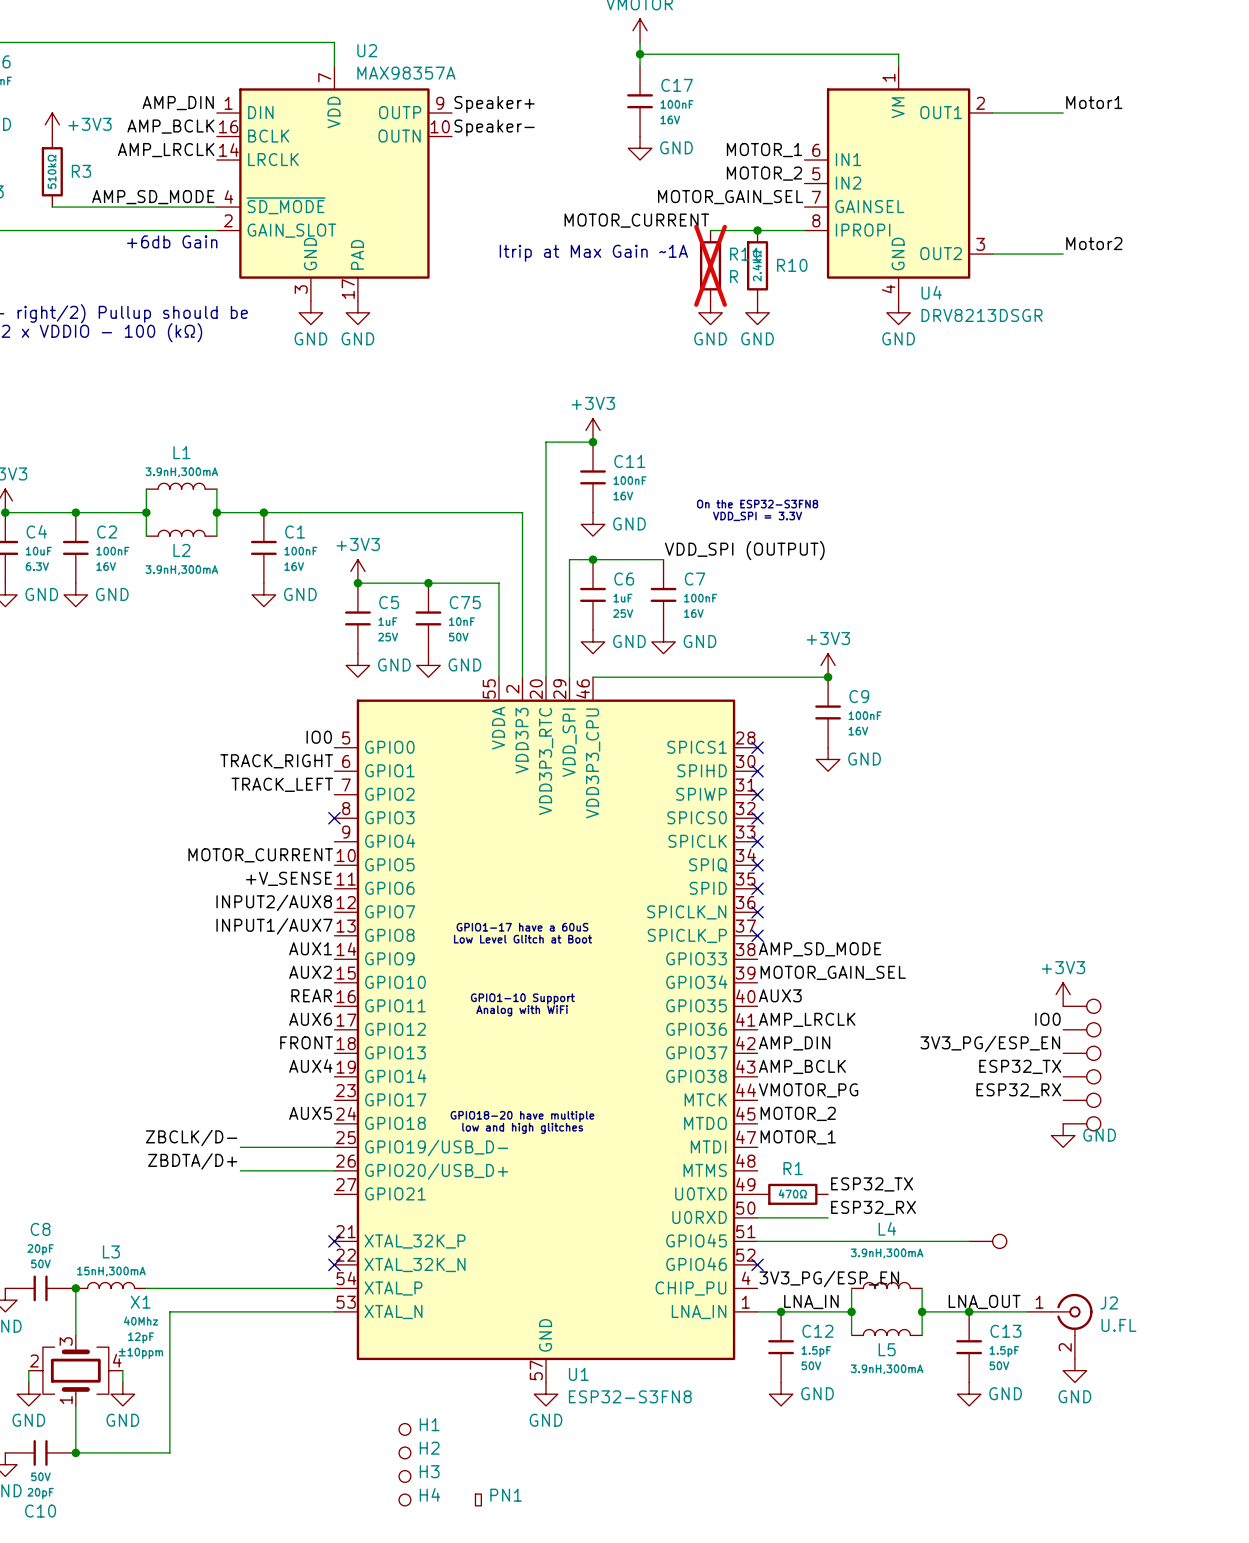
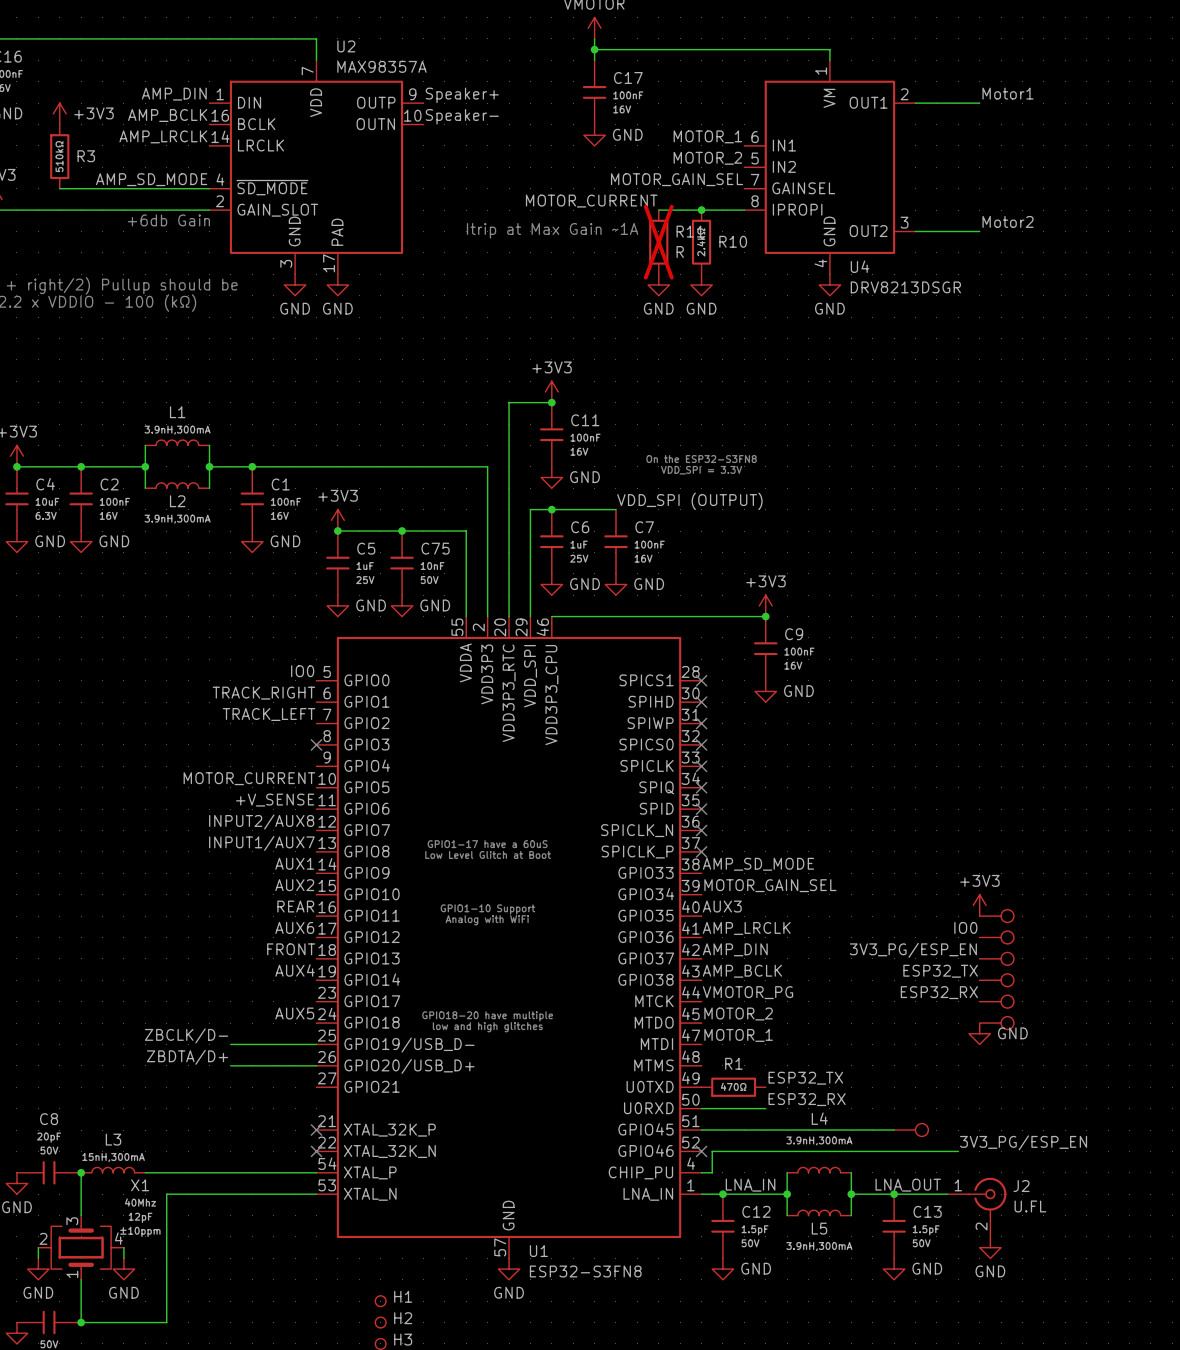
label: none -> 3V3_PG/ESP_EN (1023, 1142)
wire: none -> (958, 1151) (712, 1151) (712, 1172) (701, 1172)
label: 3V3_PG/ESP_EN (829, 1279) -> none

